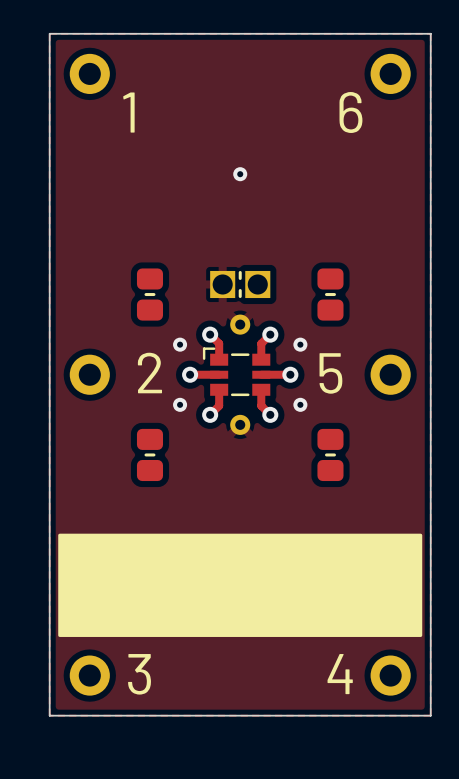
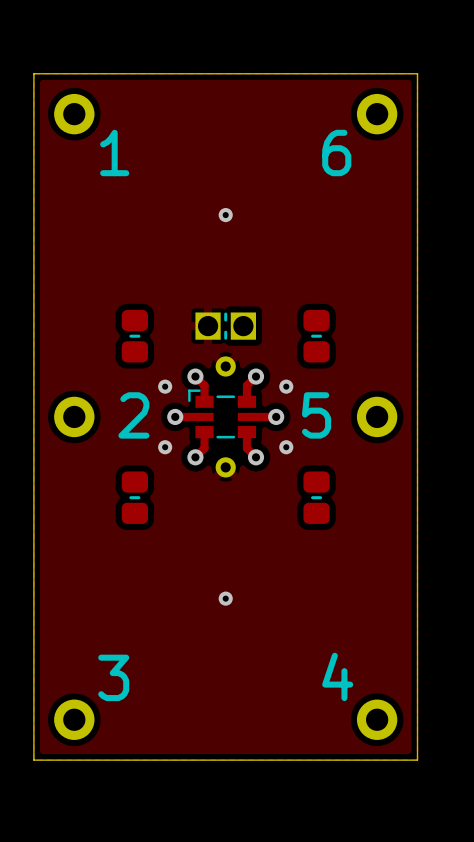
drawing: [58, 533, 423, 637] -> none
part value position: 3 (139, 674) -> 3 (113, 677)
part value position: 4 (340, 674) -> 4 (337, 676)

